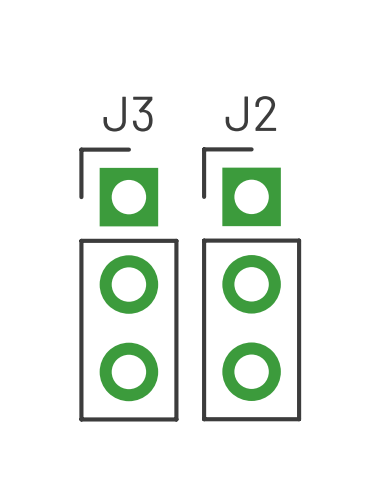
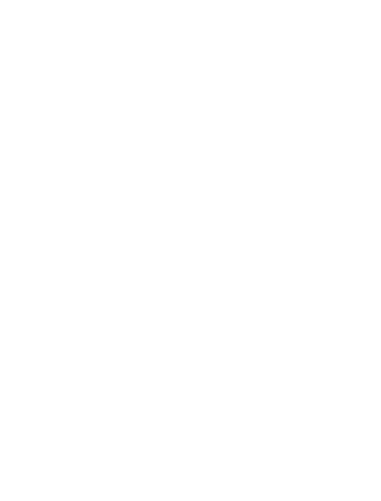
J3: (128, 284) -> none
J2: (251, 284) -> none

